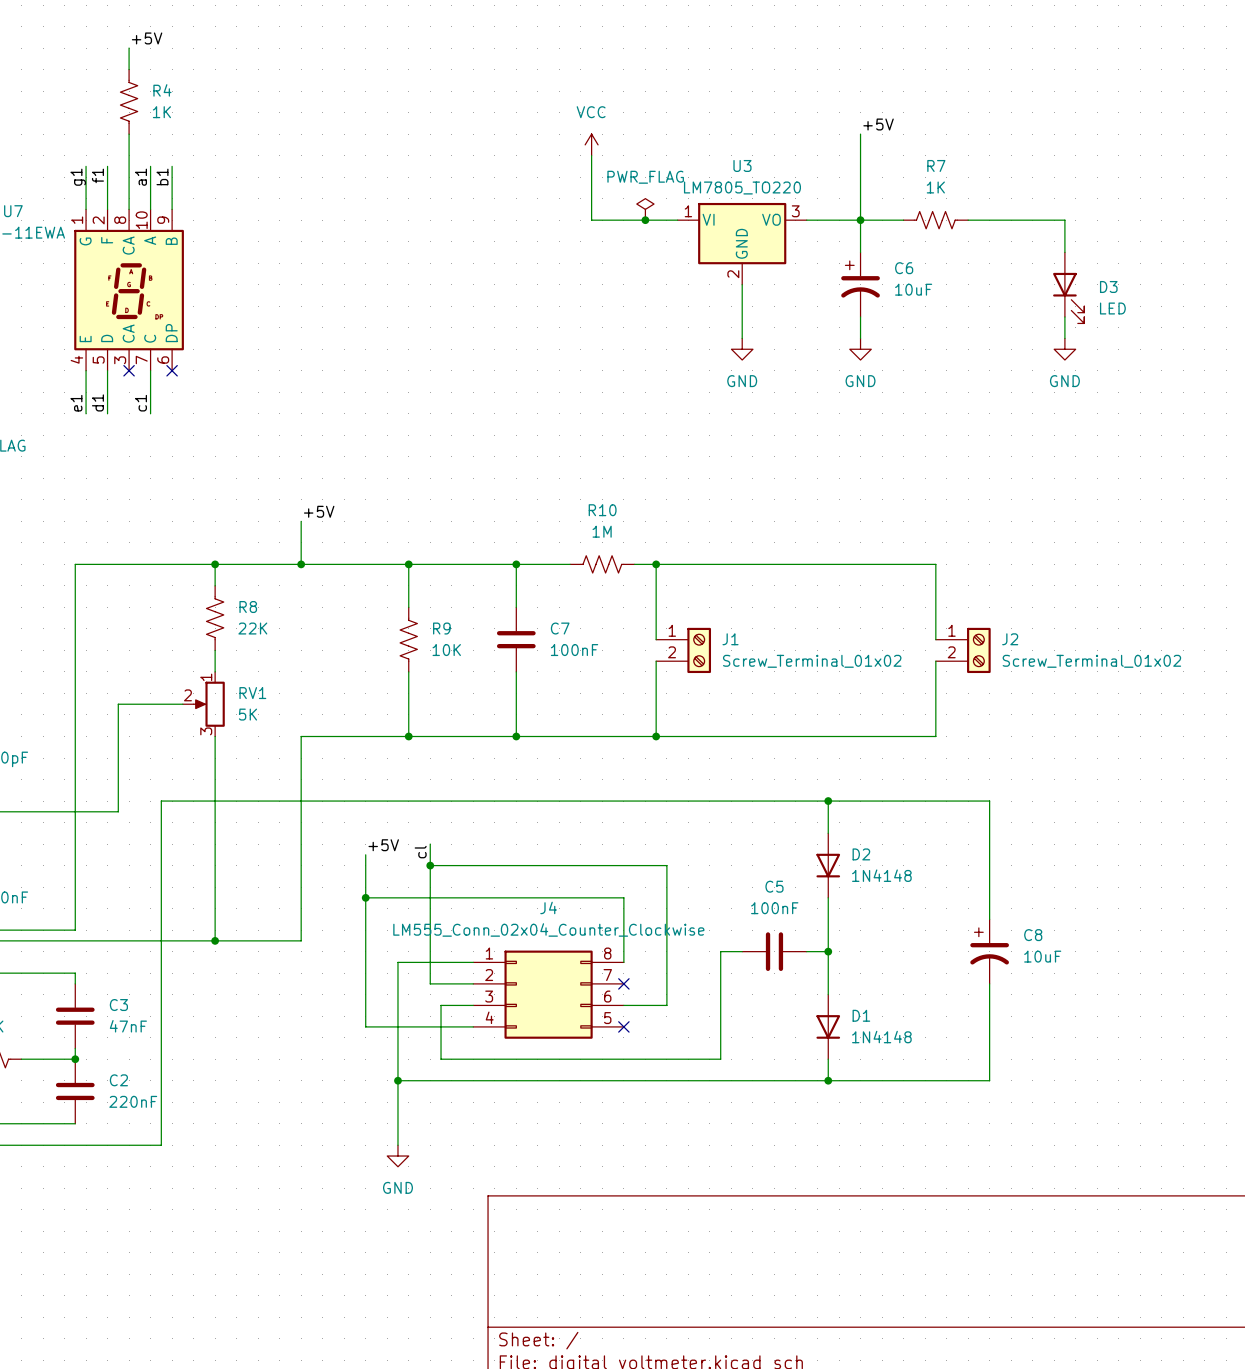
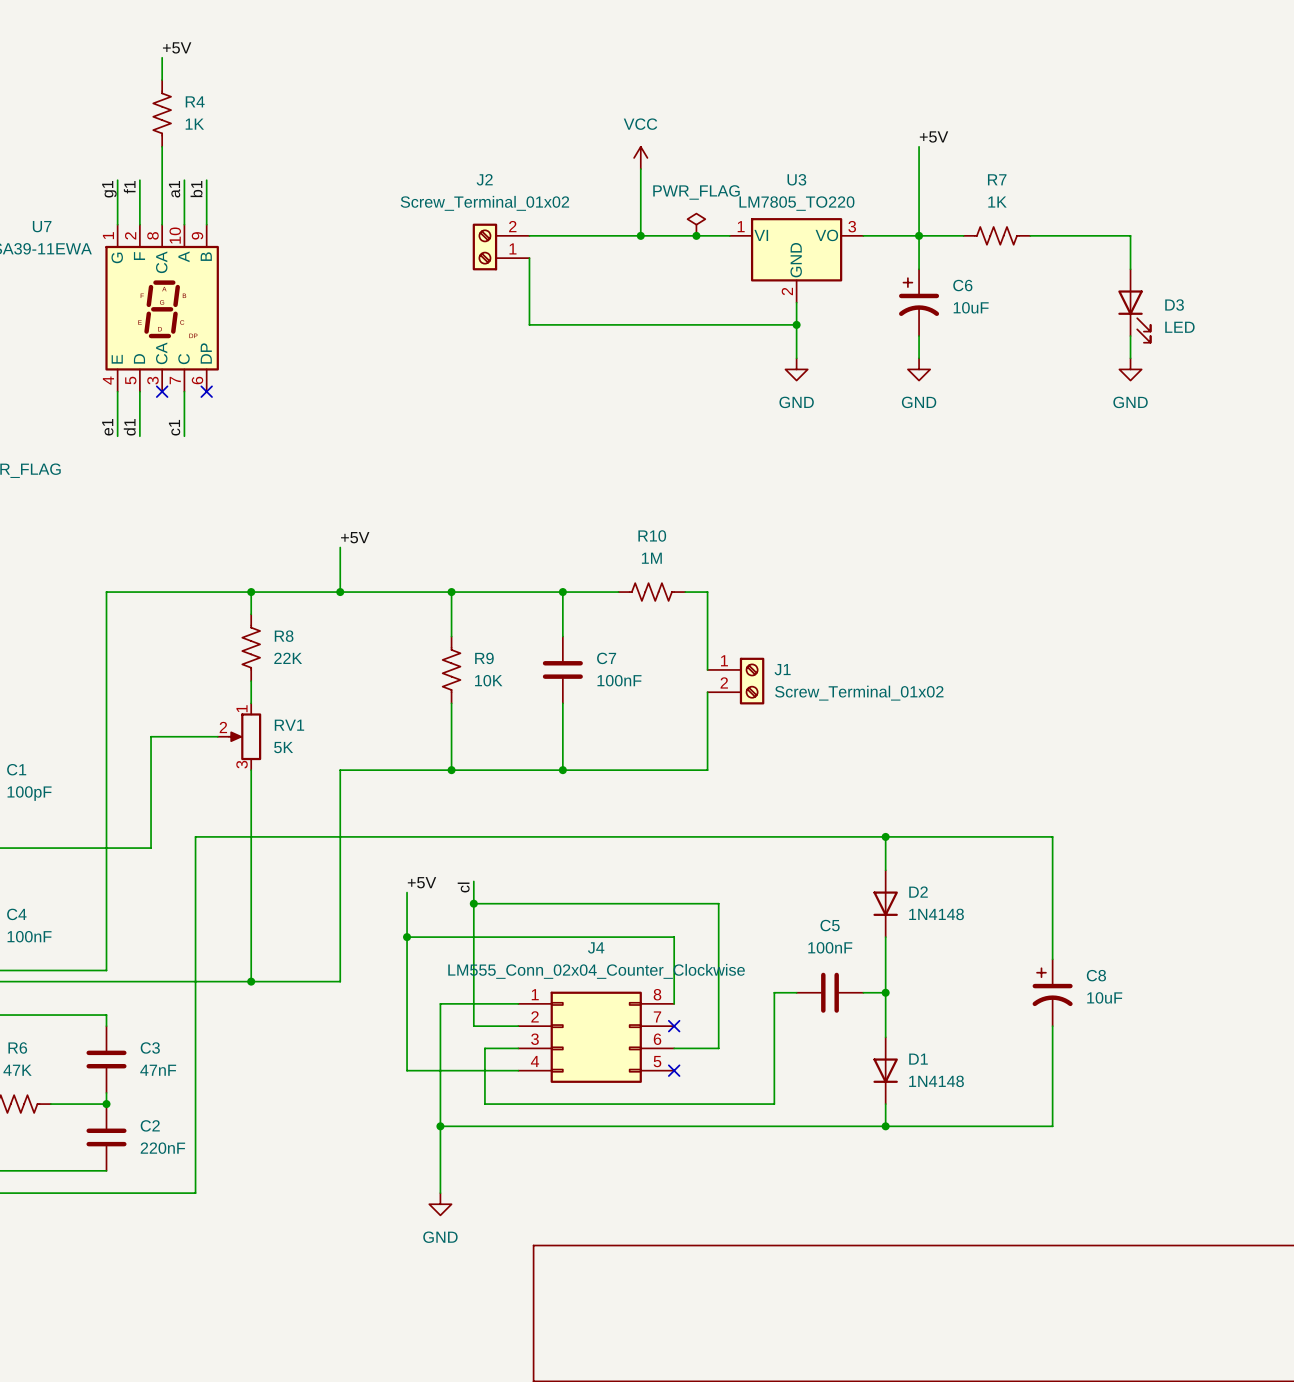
wire: none -> (529, 235) (640, 235)
junction: none -> (640, 235)
wire: none -> (529, 258) (529, 324) (796, 324)
junction: none -> (796, 324)
wire: (656, 564) (935, 564) (935, 639) -> none
junction: (656, 564) -> none
J2 name position: J2 (1010, 639) -> J2 (484, 179)
J2 position: (963, 650) -> (501, 246)
J2 rotation: 0° (978, 650) -> 180° (484, 246)
wire: (935, 661) (935, 736) (656, 736) -> none
J2 value position: Screw_Terminal_01x02 (1091, 661) -> Screw_Terminal_01x02 (484, 203)
junction: (656, 736) -> none

